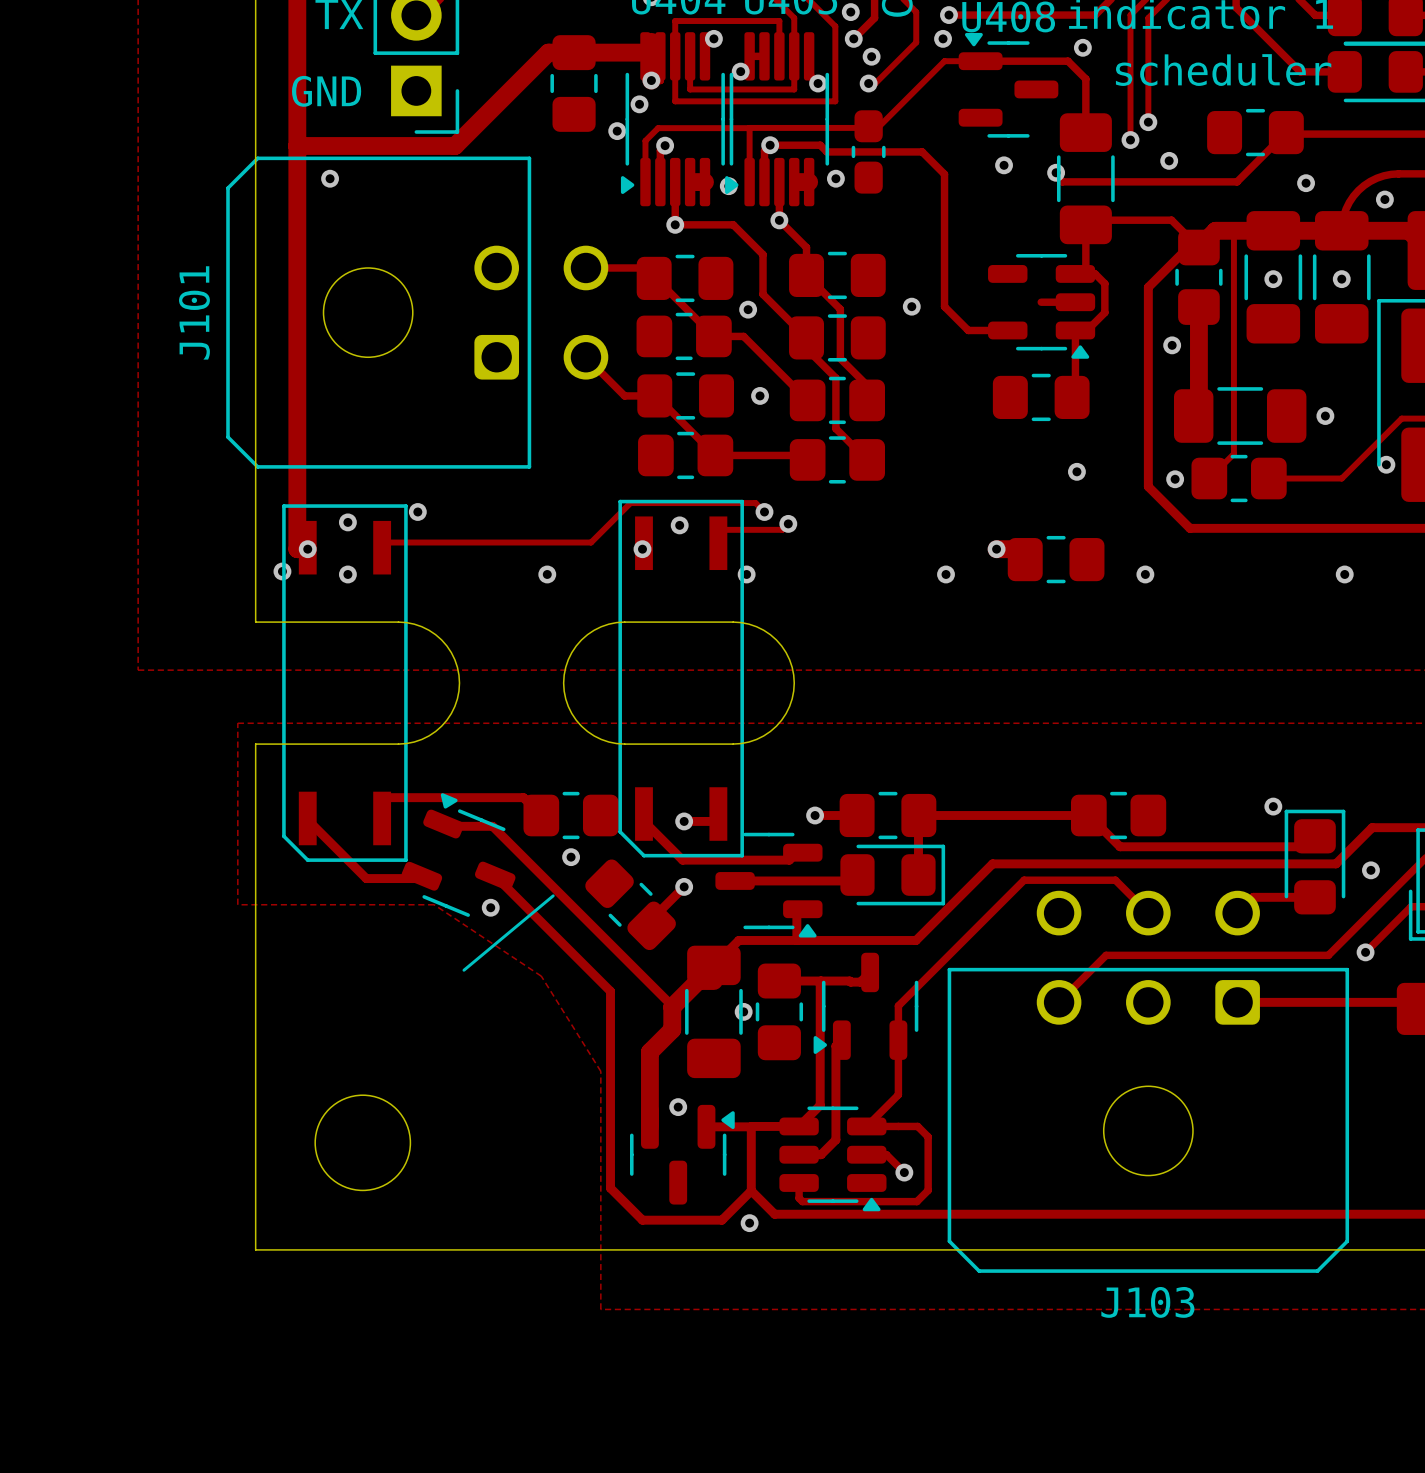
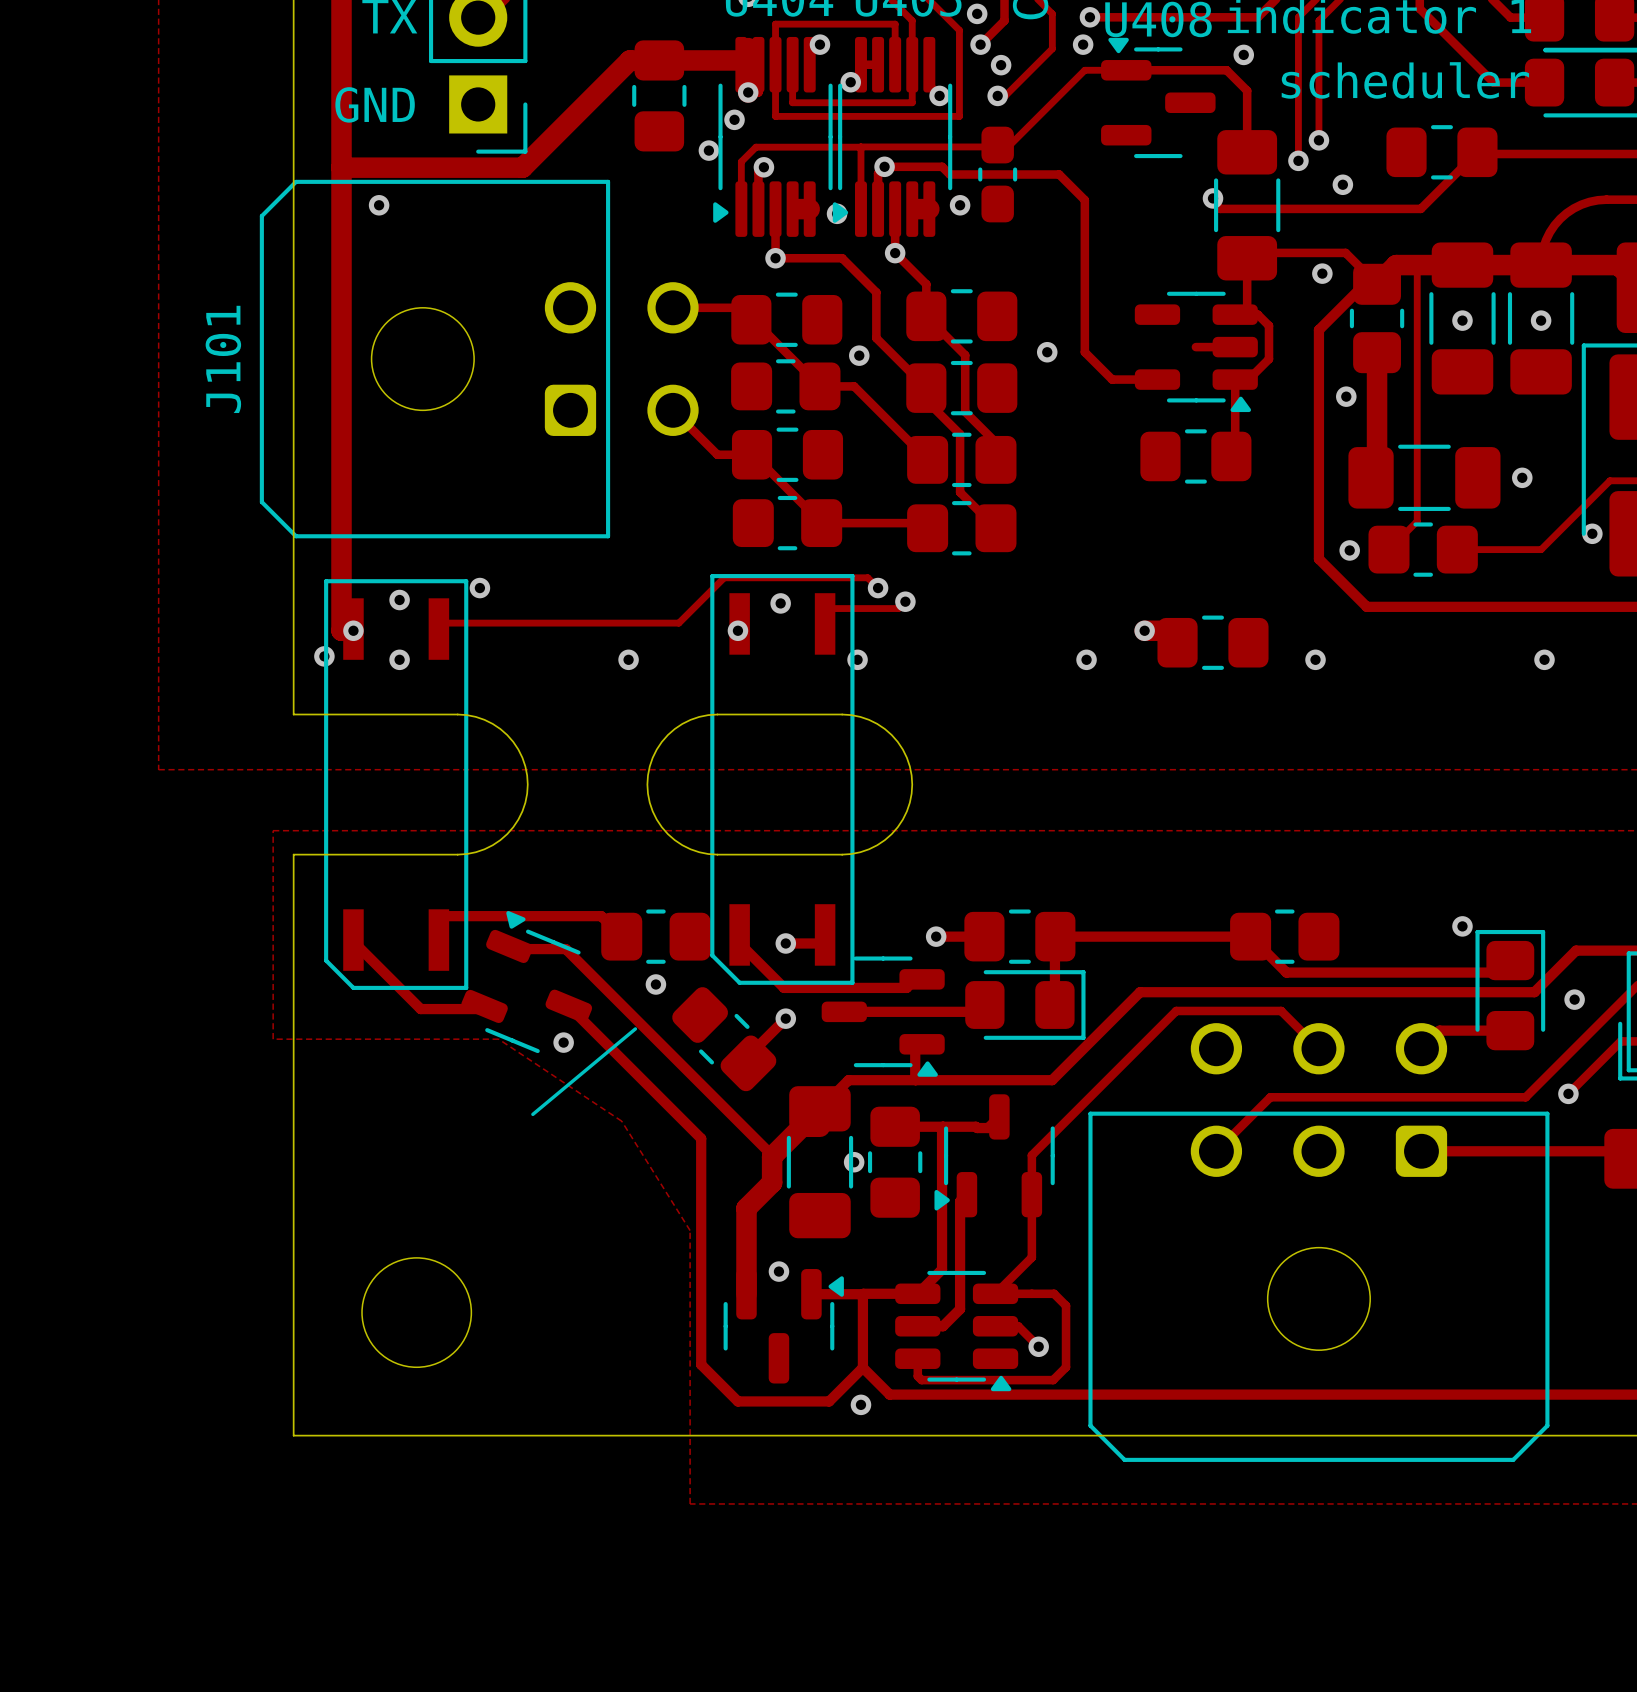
via: (1004, 165) -> none
via: (1306, 183) -> none
via: (1384, 199) -> none
via: none -> (1322, 273)
via: (760, 395) -> none
via: (1076, 471) -> none
J103 name: J103 (1147, 1302) -> none

